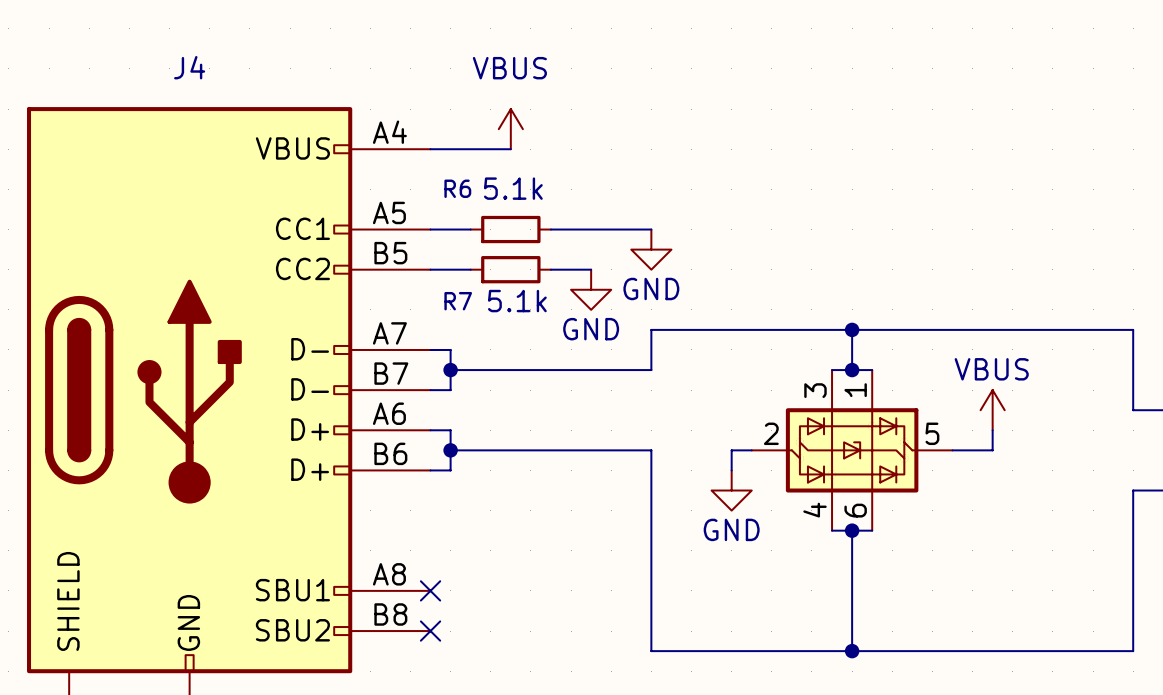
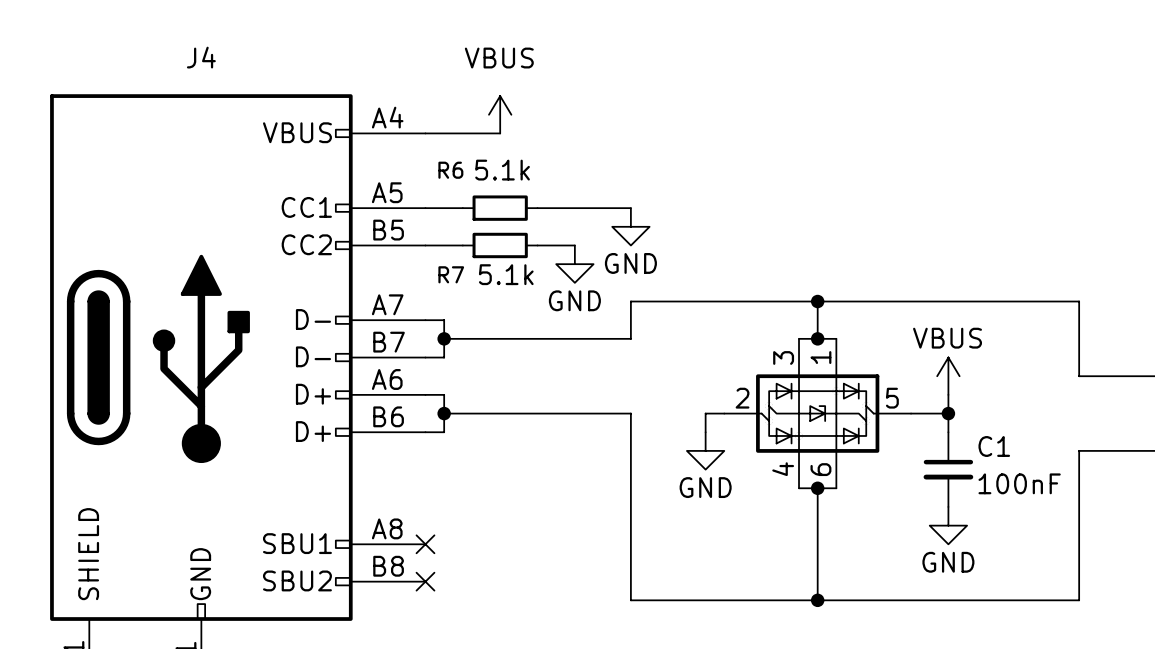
wire: none -> (948, 413) (948, 432)
junction: none -> (948, 413)
C1: none -> 100nF (948, 469)
power symbol: none -> GND (948, 525)

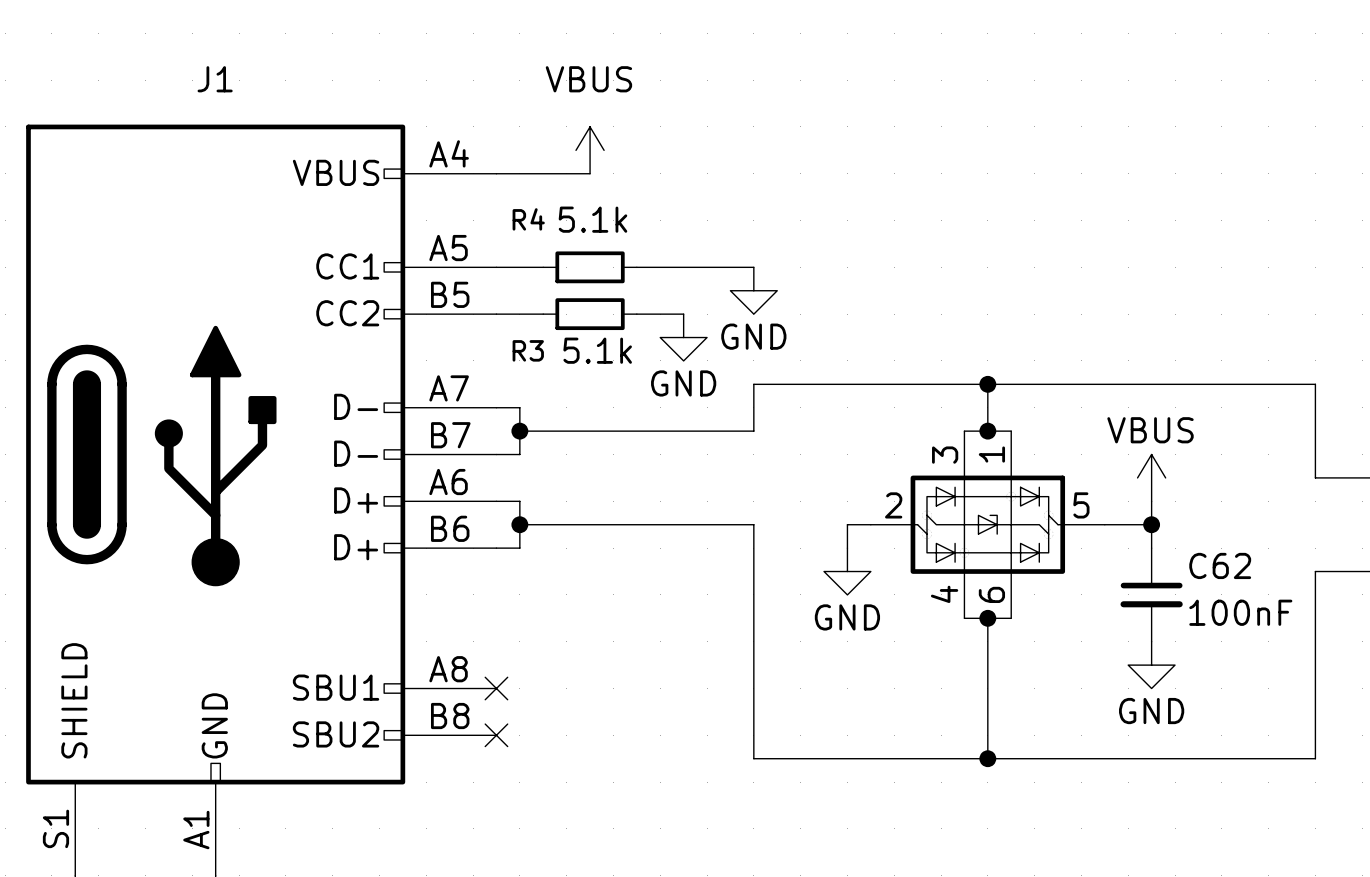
J4 name: J4 (201, 57) -> J1 (215, 79)
R6 name: R6 (450, 170) -> R4 (528, 219)
R7 name: R7 (451, 274) -> R3 (528, 350)
C1 name: C1 (994, 446) -> C62 (1220, 565)

